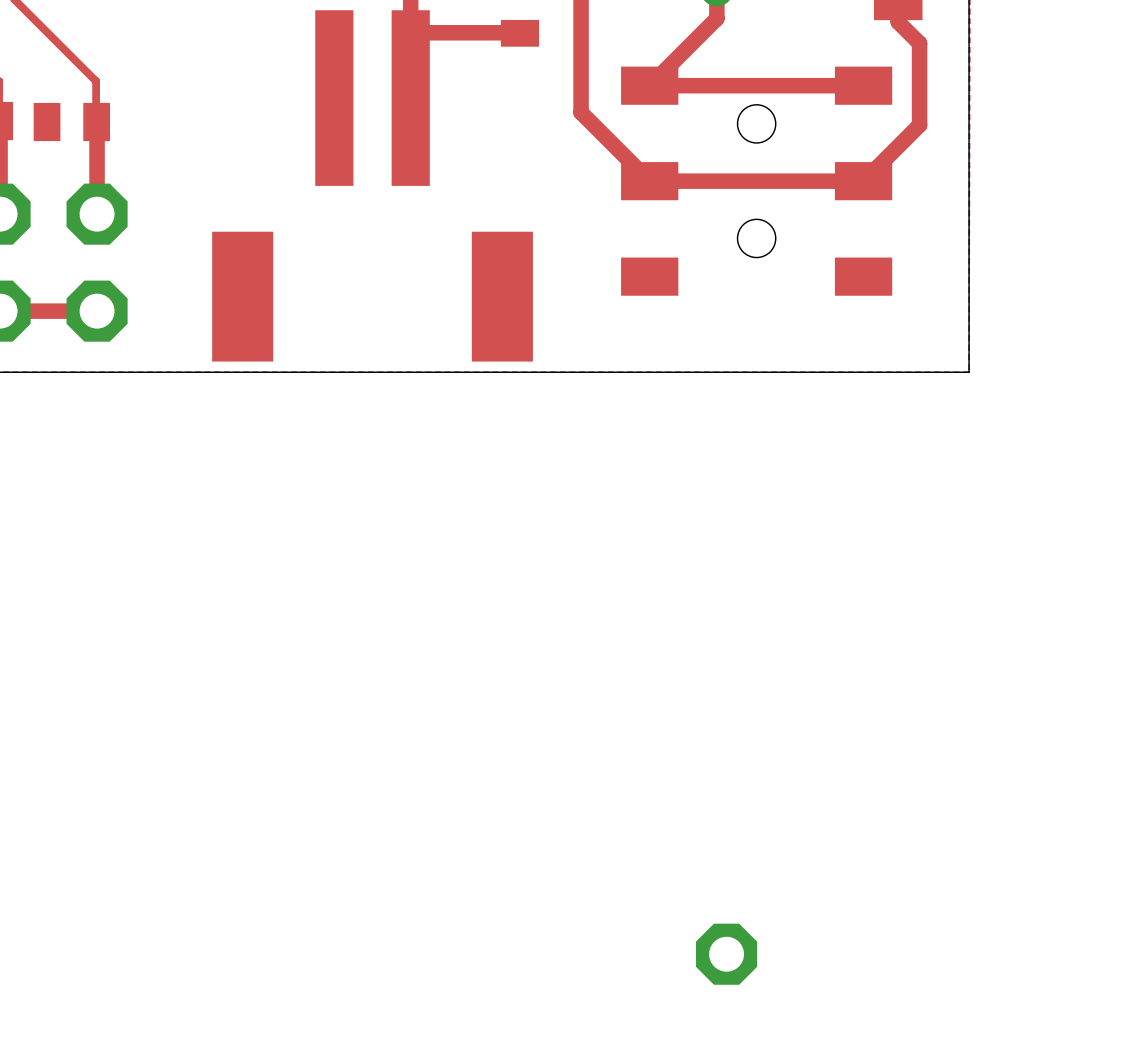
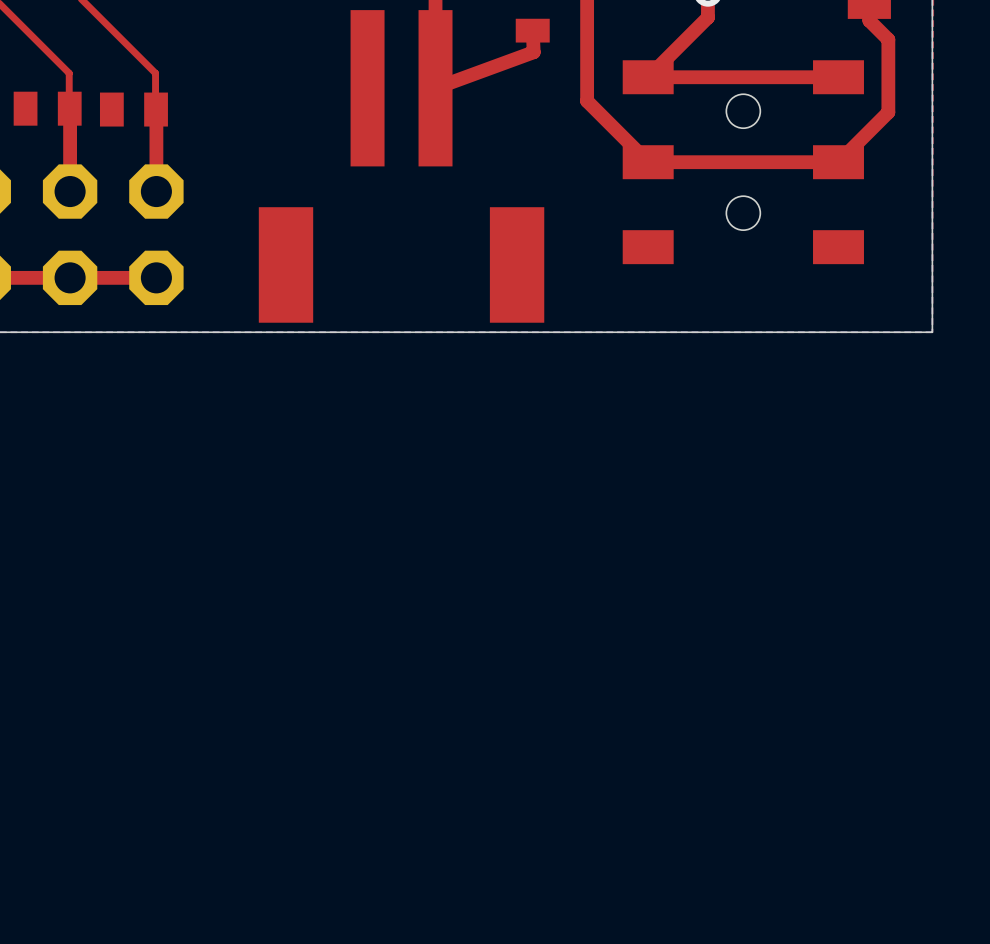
top track: (410, 32) (519, 33) -> (435, 88) (533, 52) (532, 30)
part: (726, 954) -> none

